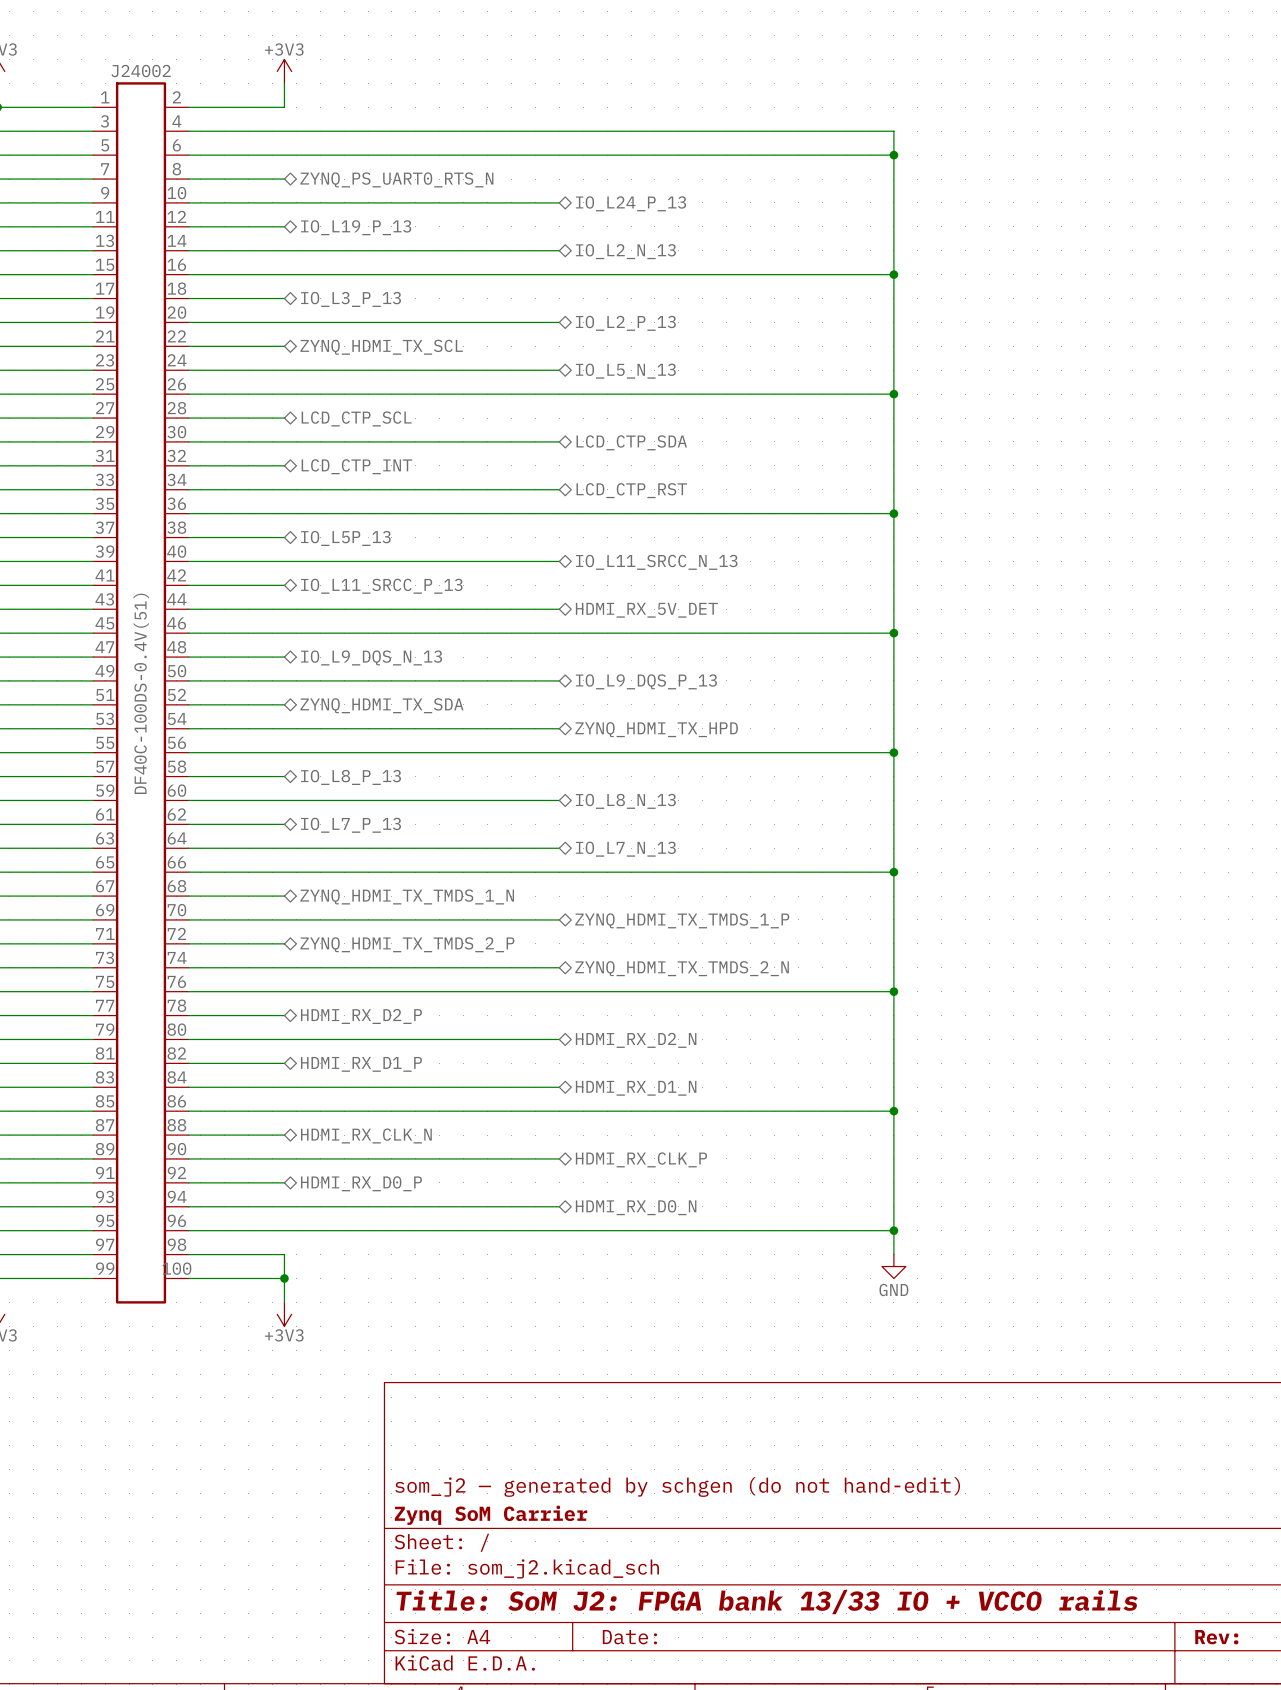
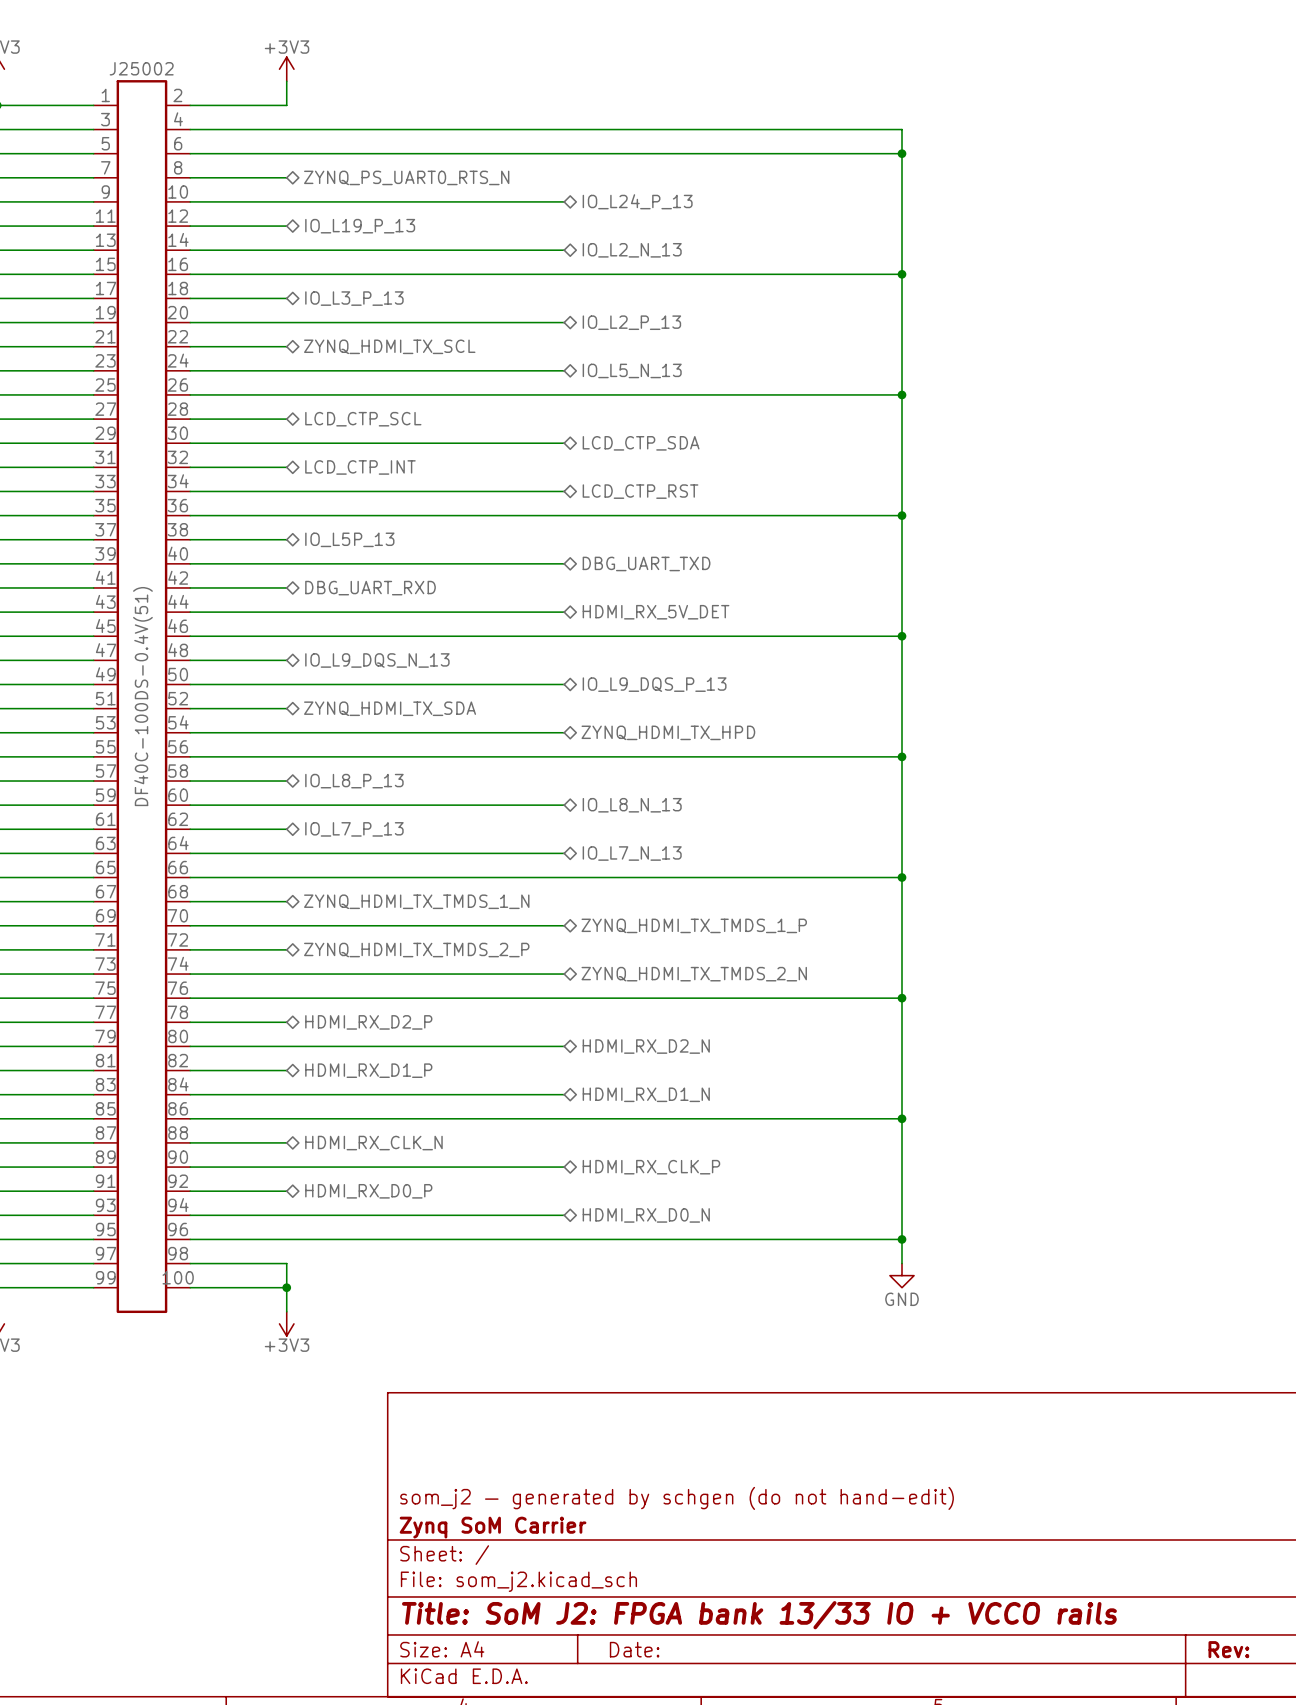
J24002 name: J24002 (141, 71) -> J25002 (141, 68)
hierarchical label: IO_L11_SRCC_N_13 (656, 562) -> DBG_UART_TXD (646, 563)
hierarchical label: IO_L11_SRCC_P_13 (381, 586) -> DBG_UART_RXD (370, 588)

